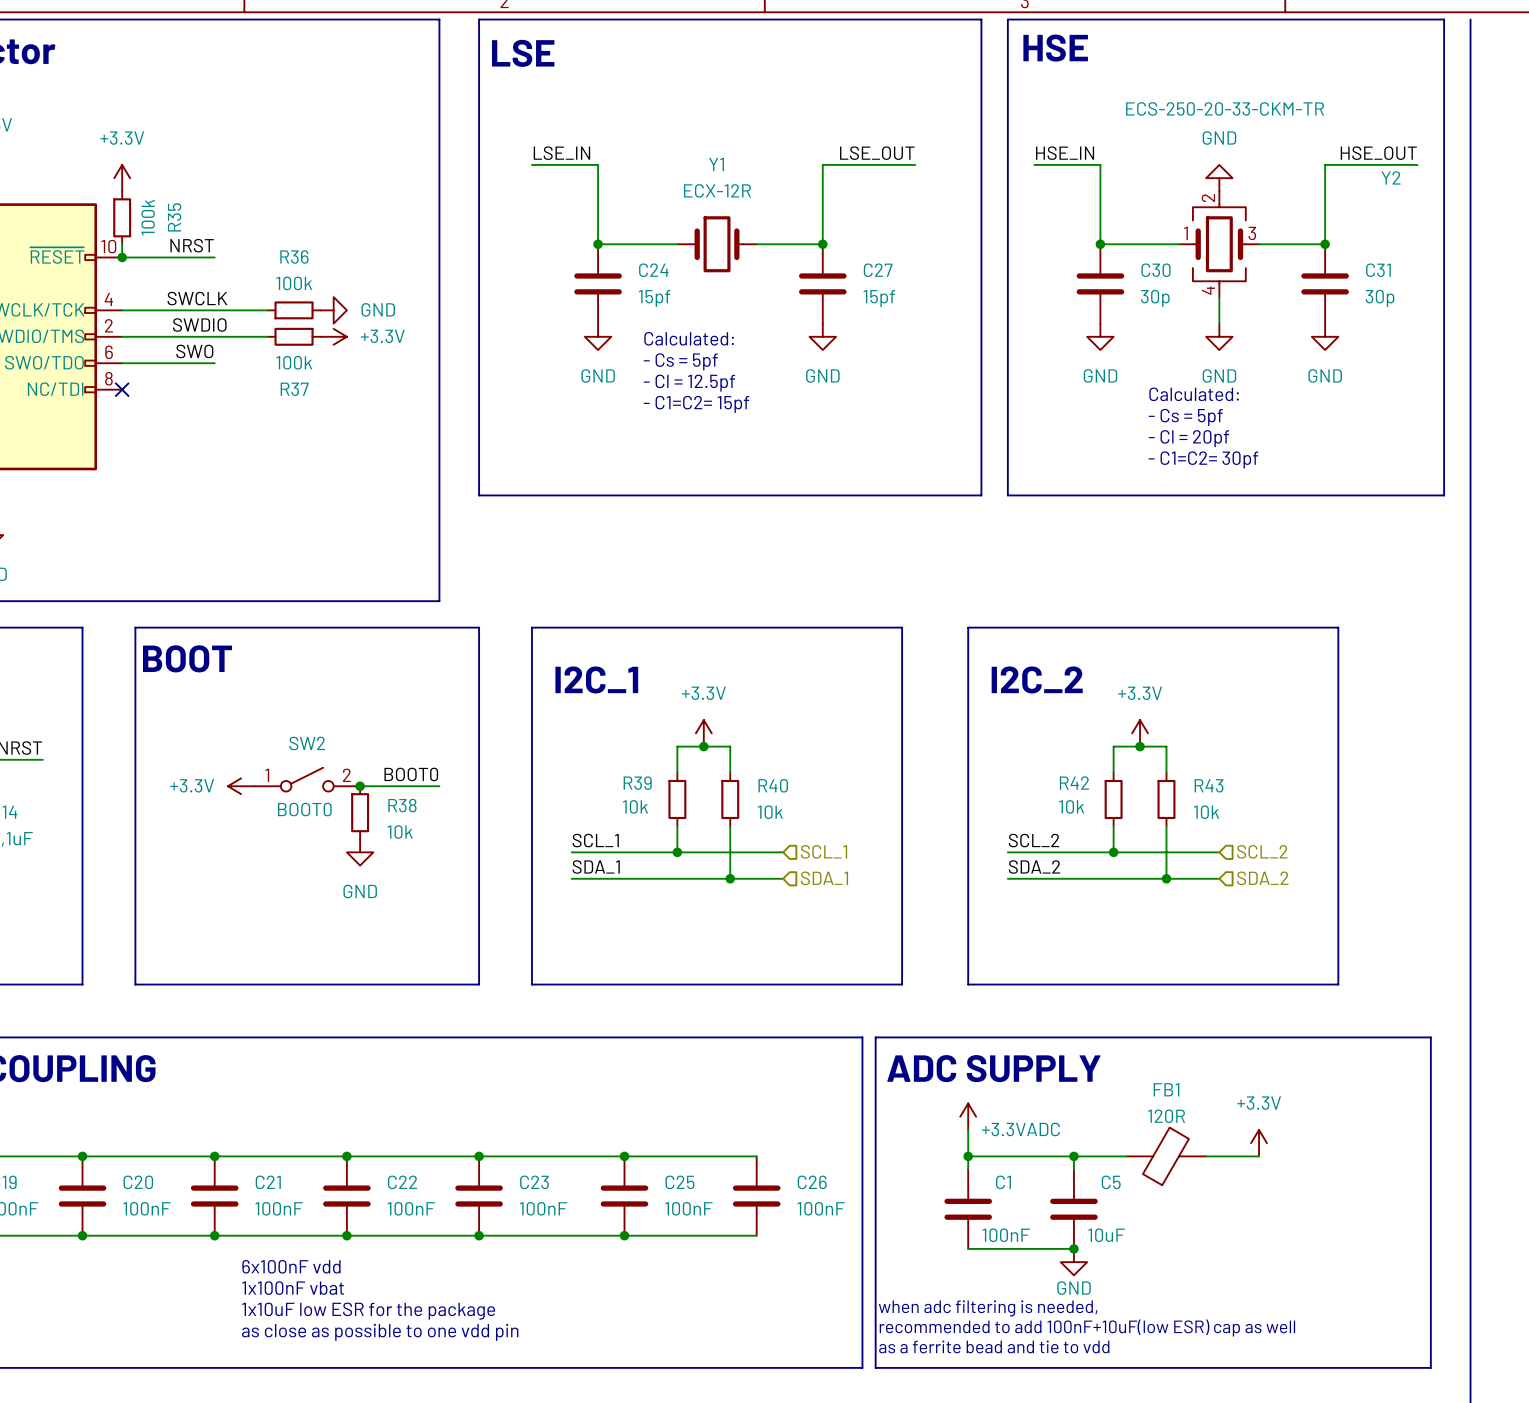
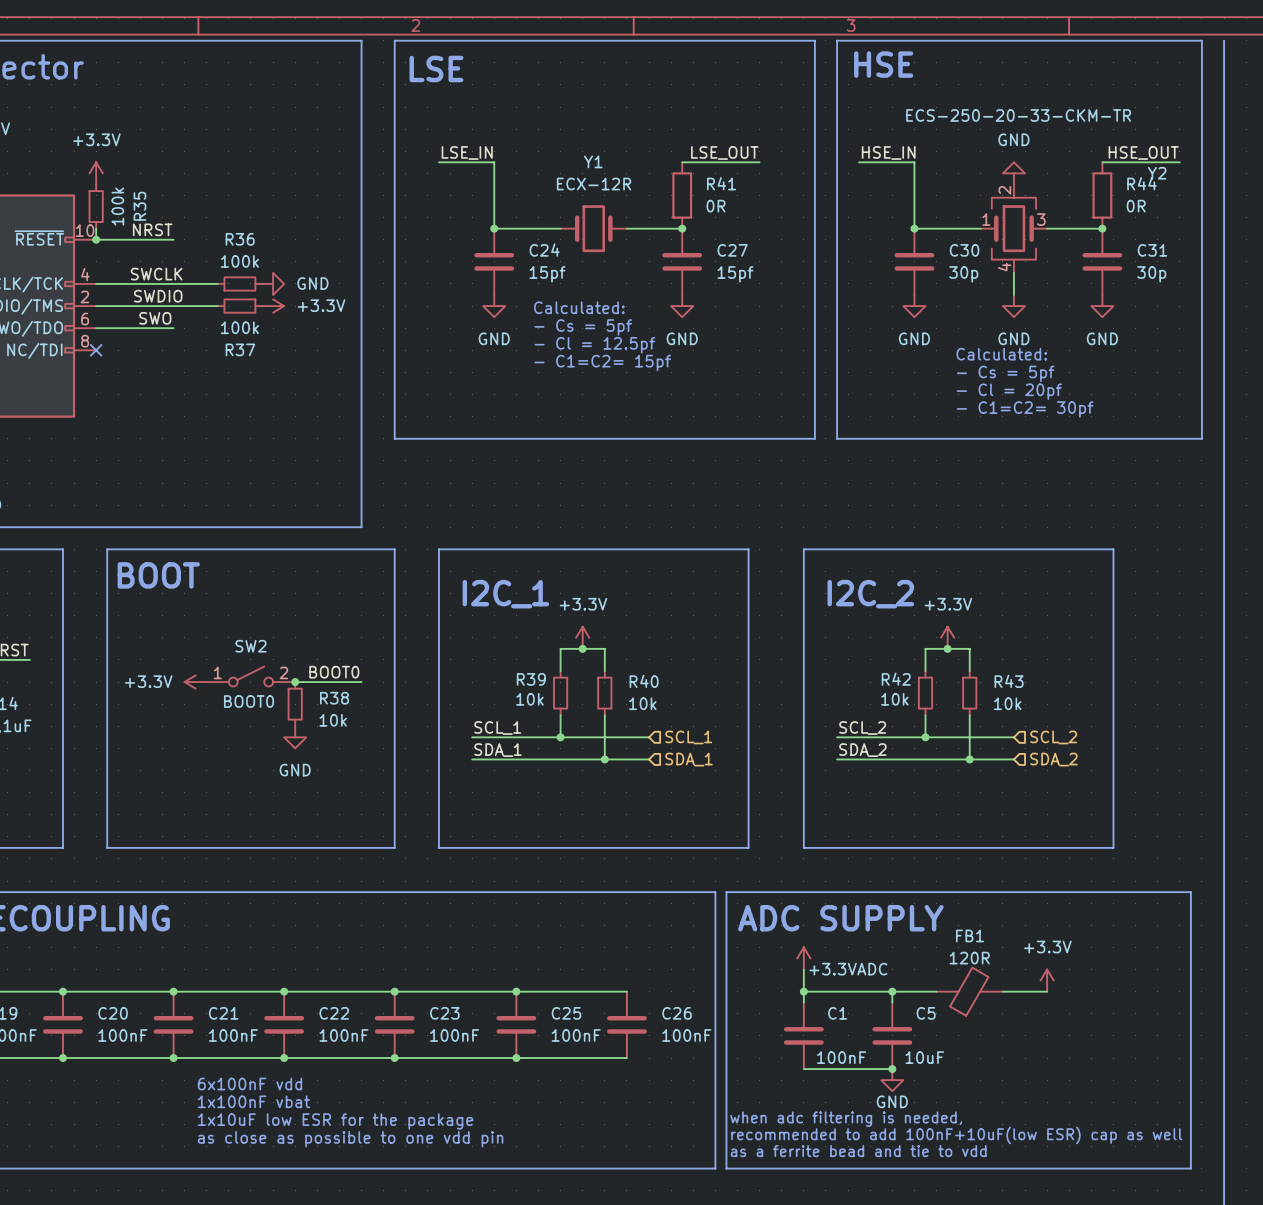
wire: (822, 164) (822, 244) -> none
wire: (1325, 164) (1325, 244) -> none
R41: none -> 0R (682, 195)
R44: none -> 0R (1102, 195)

